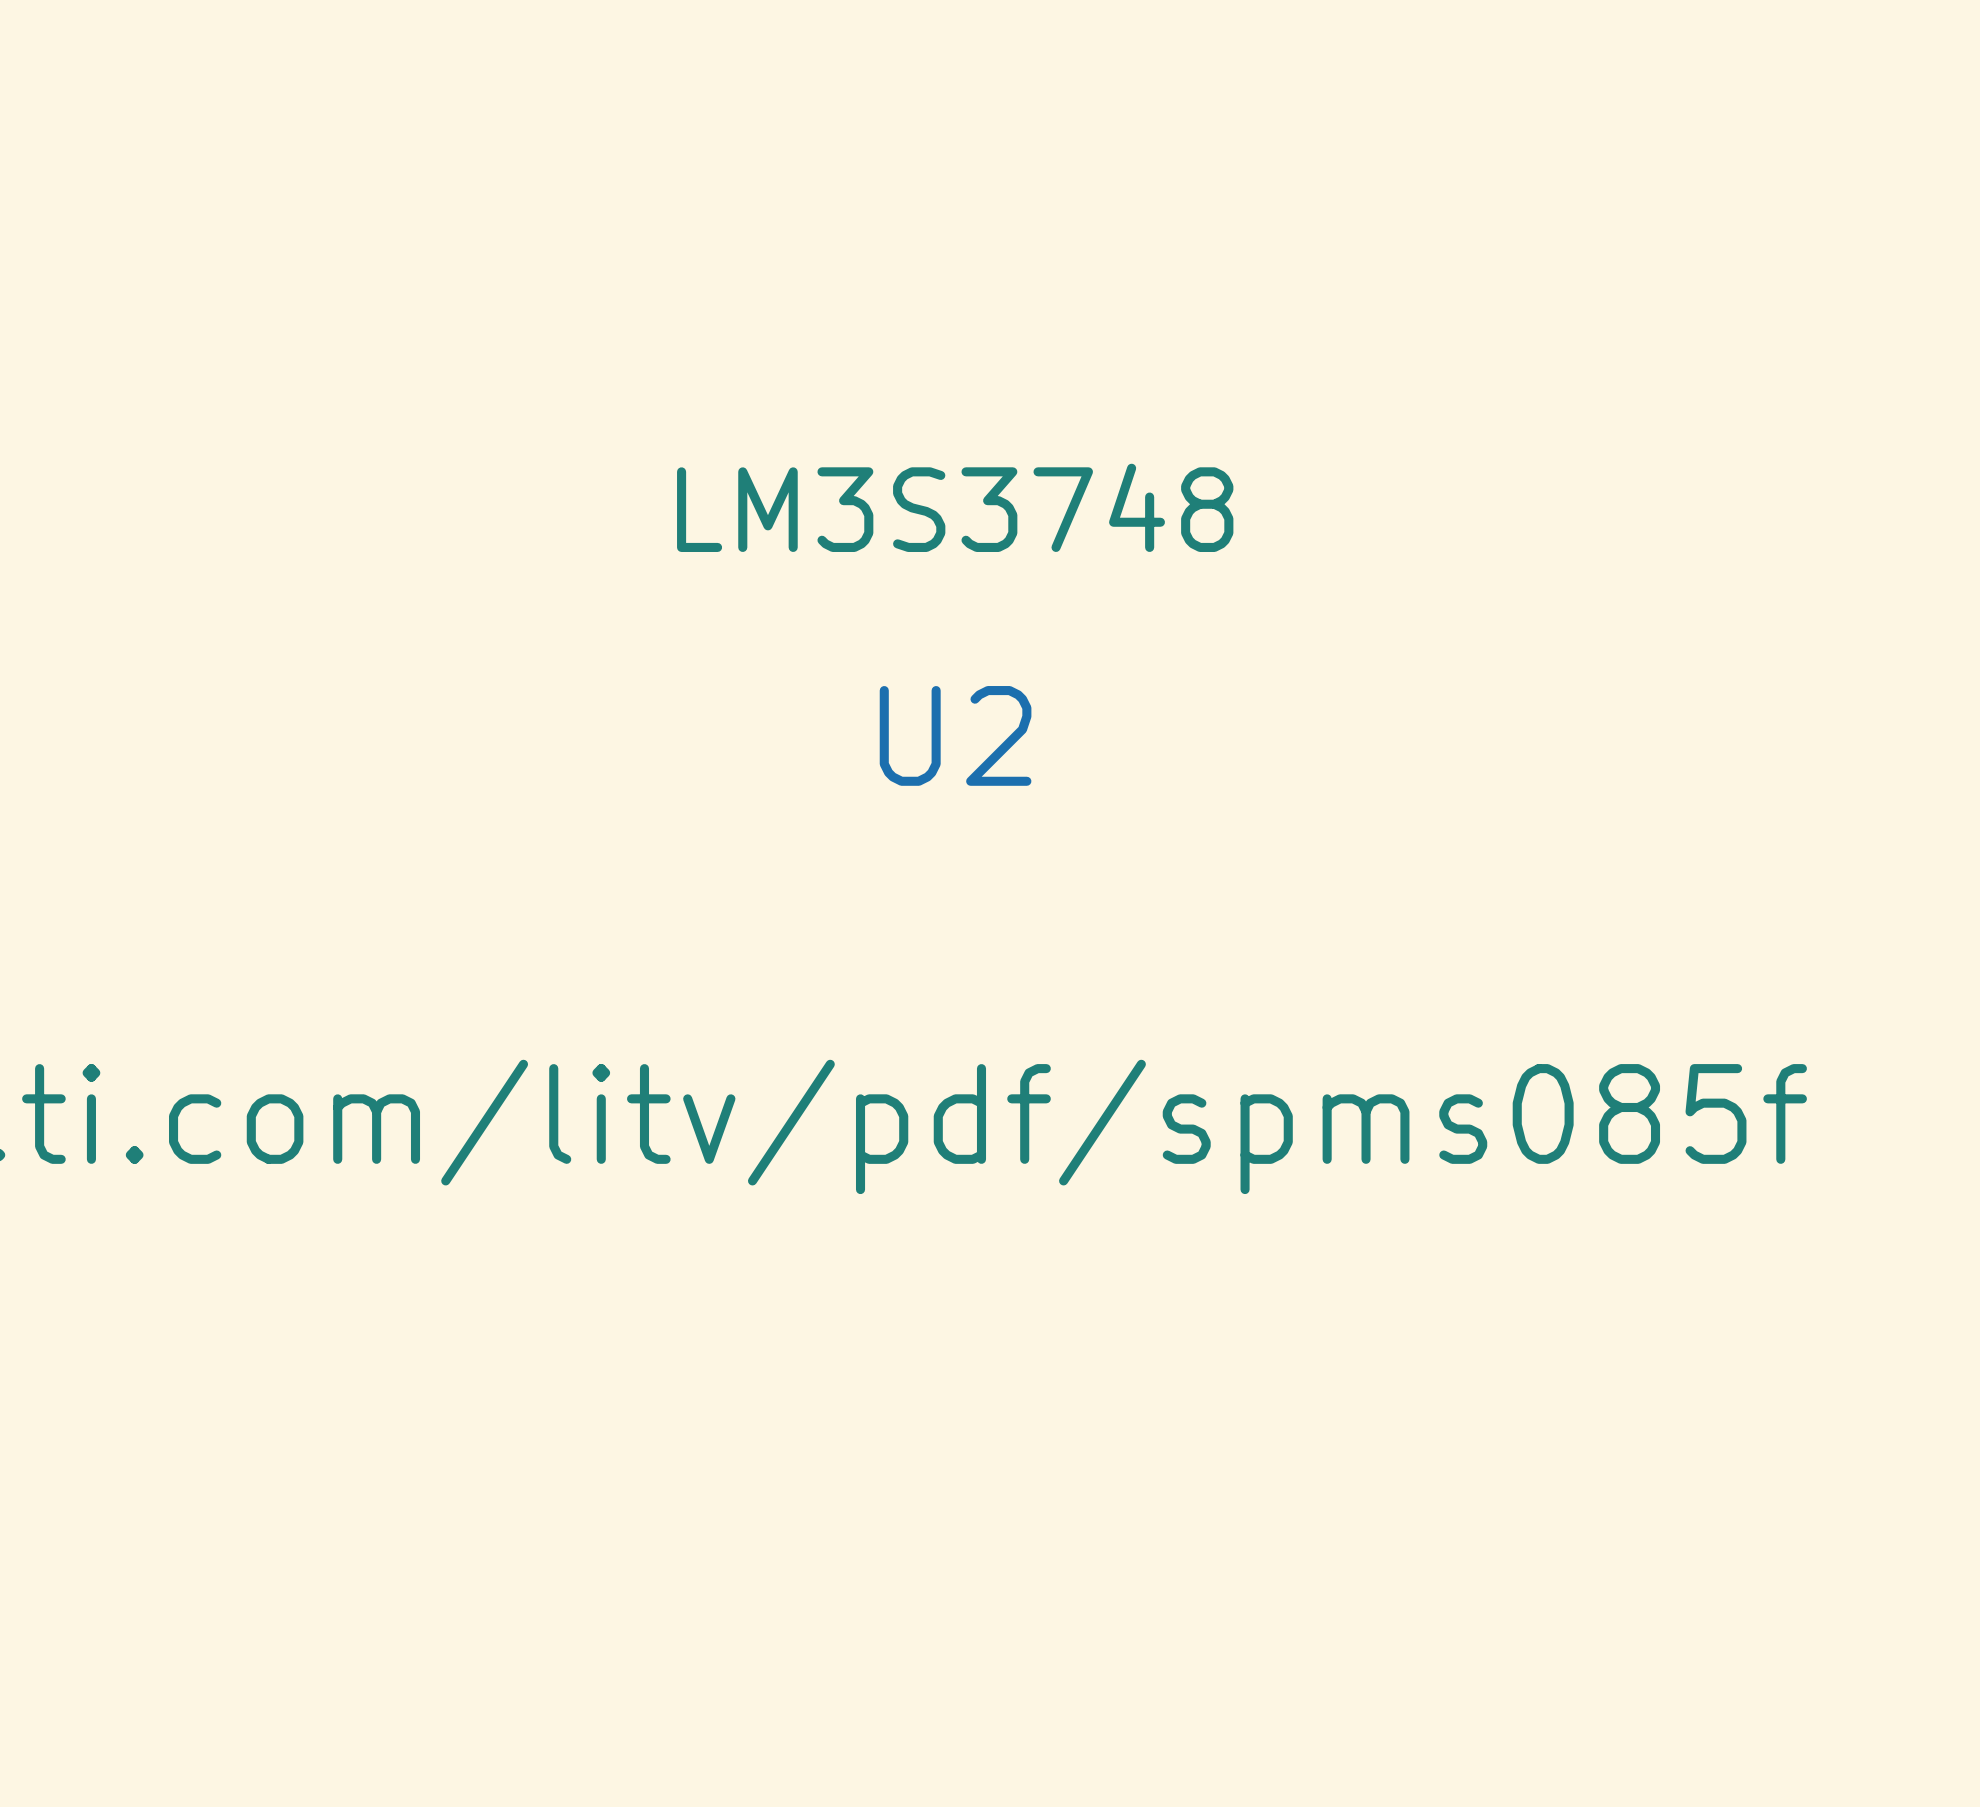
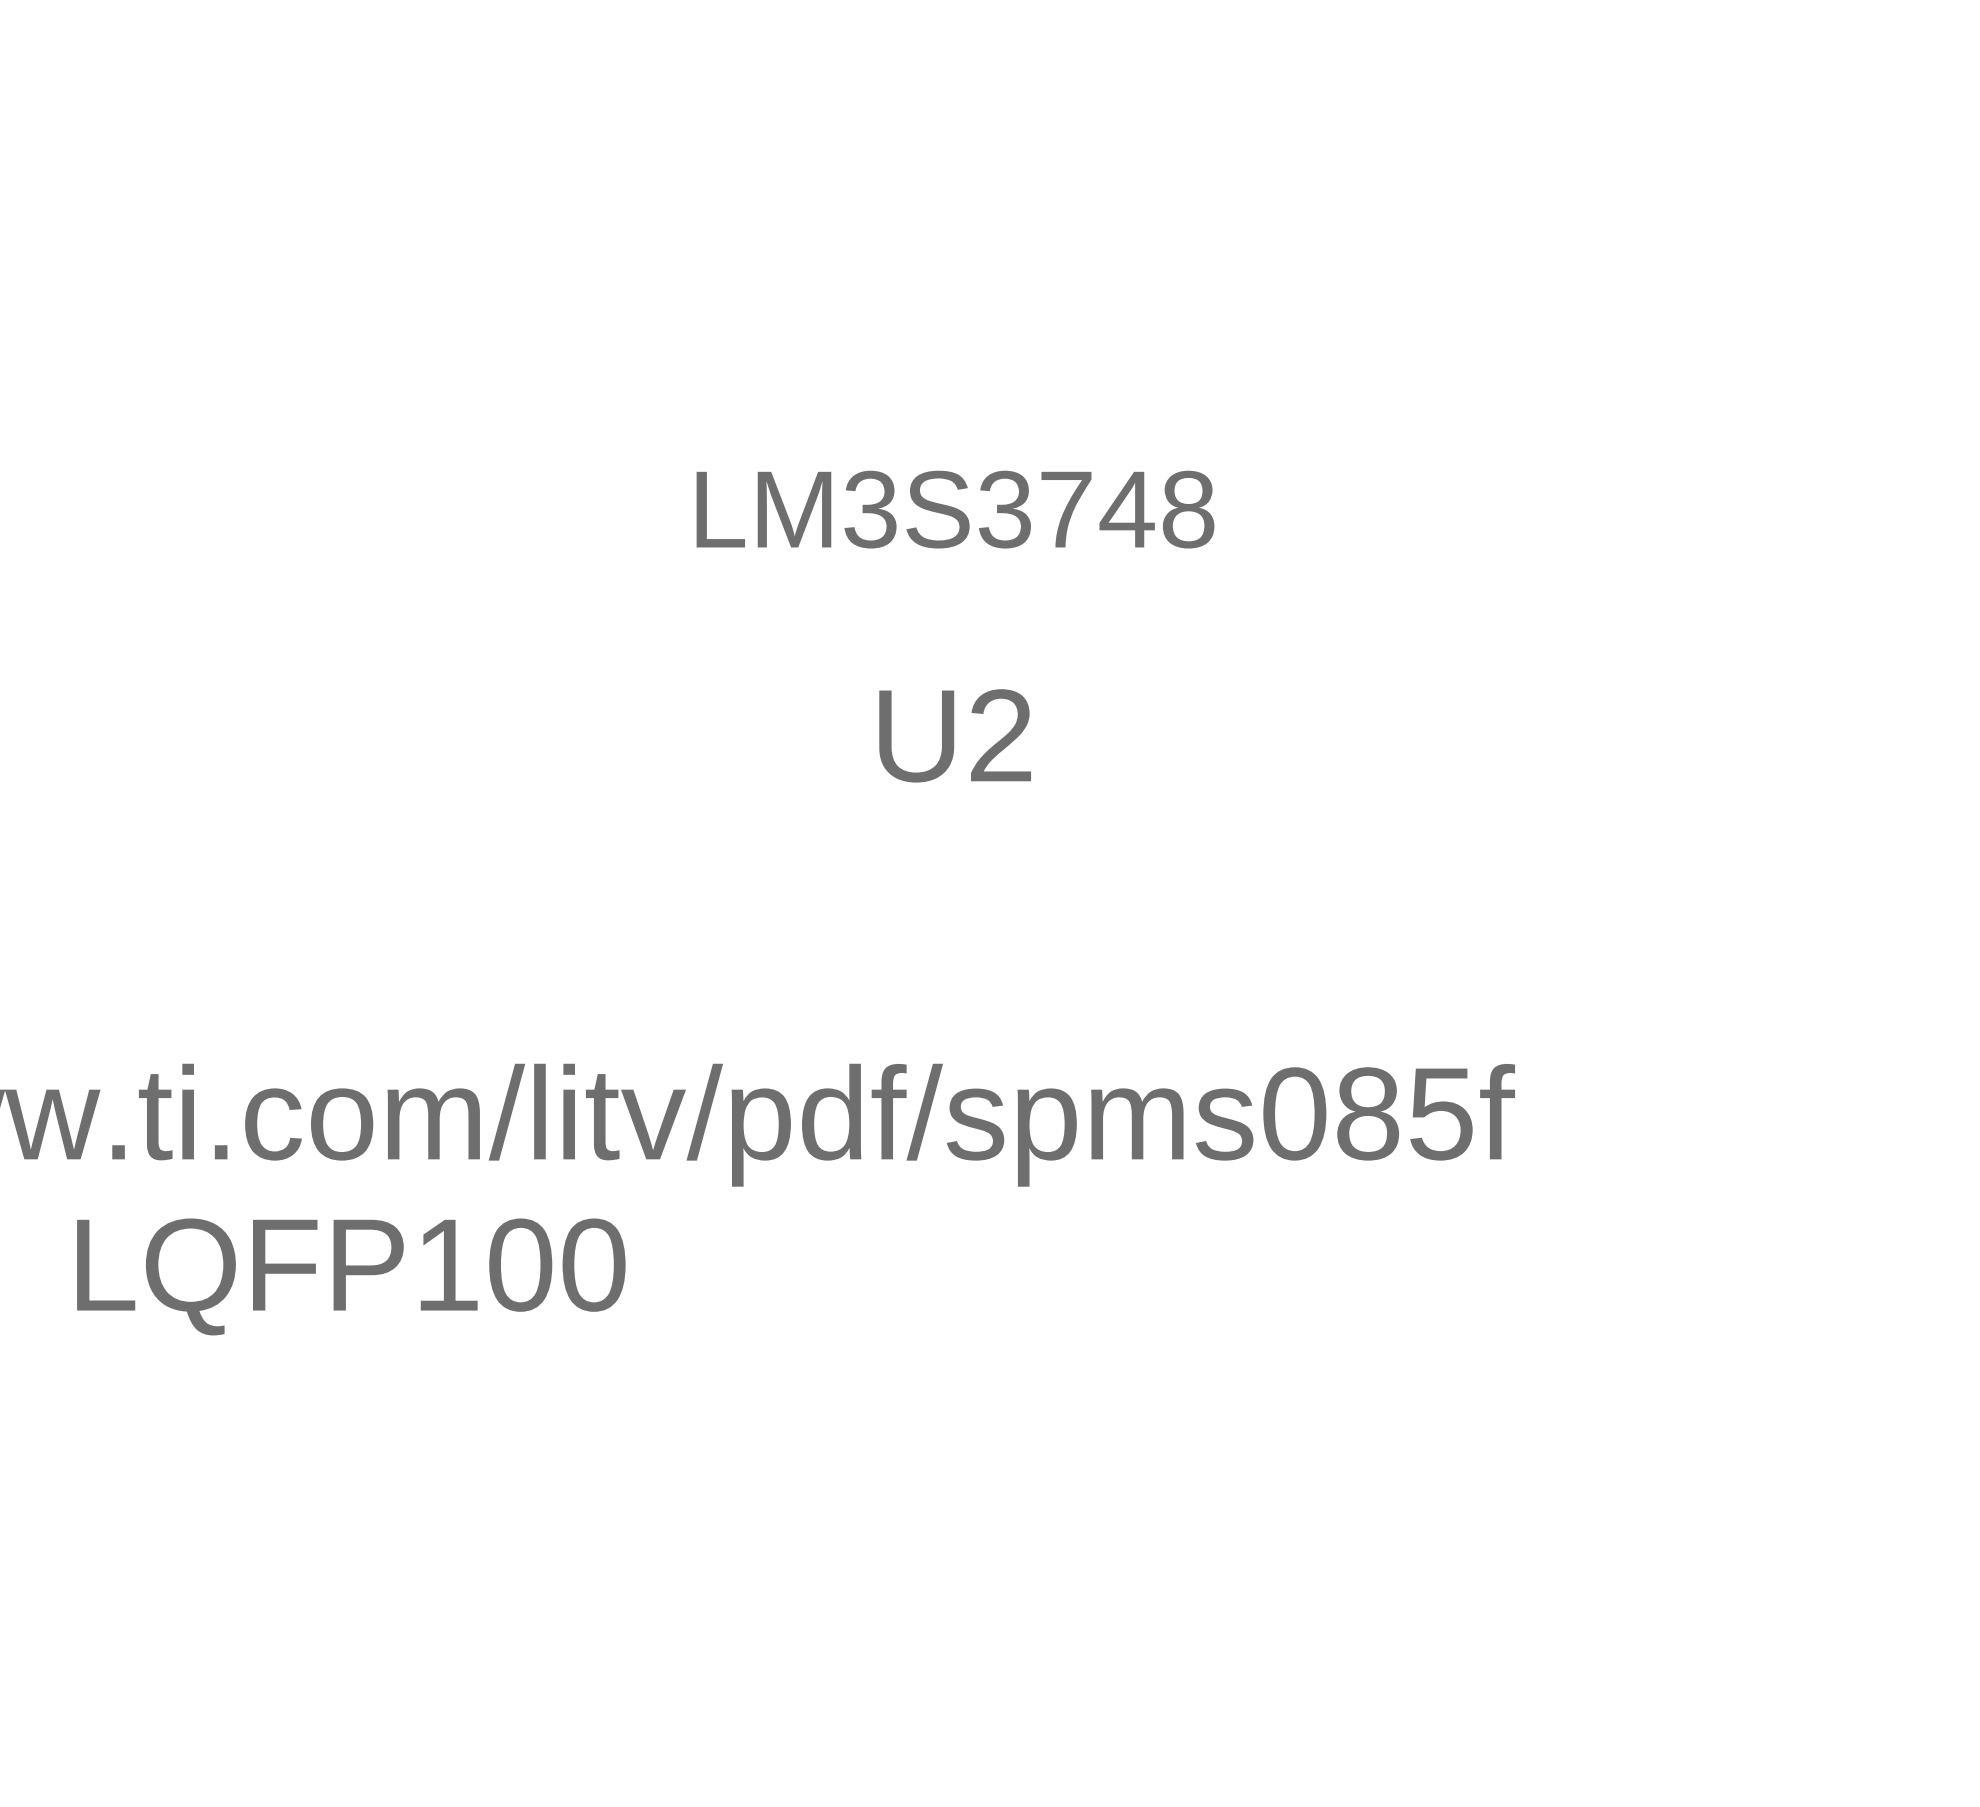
U2 text: none -> LQFP100 (351, 1276)

